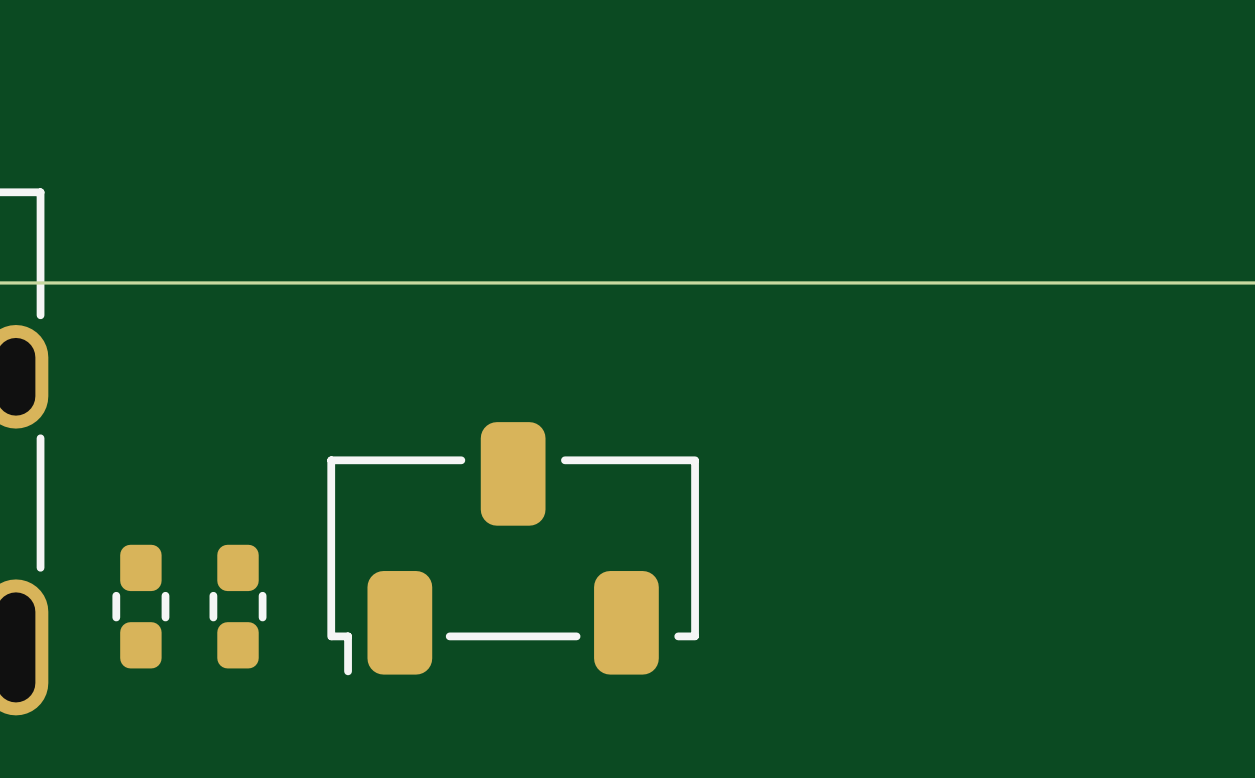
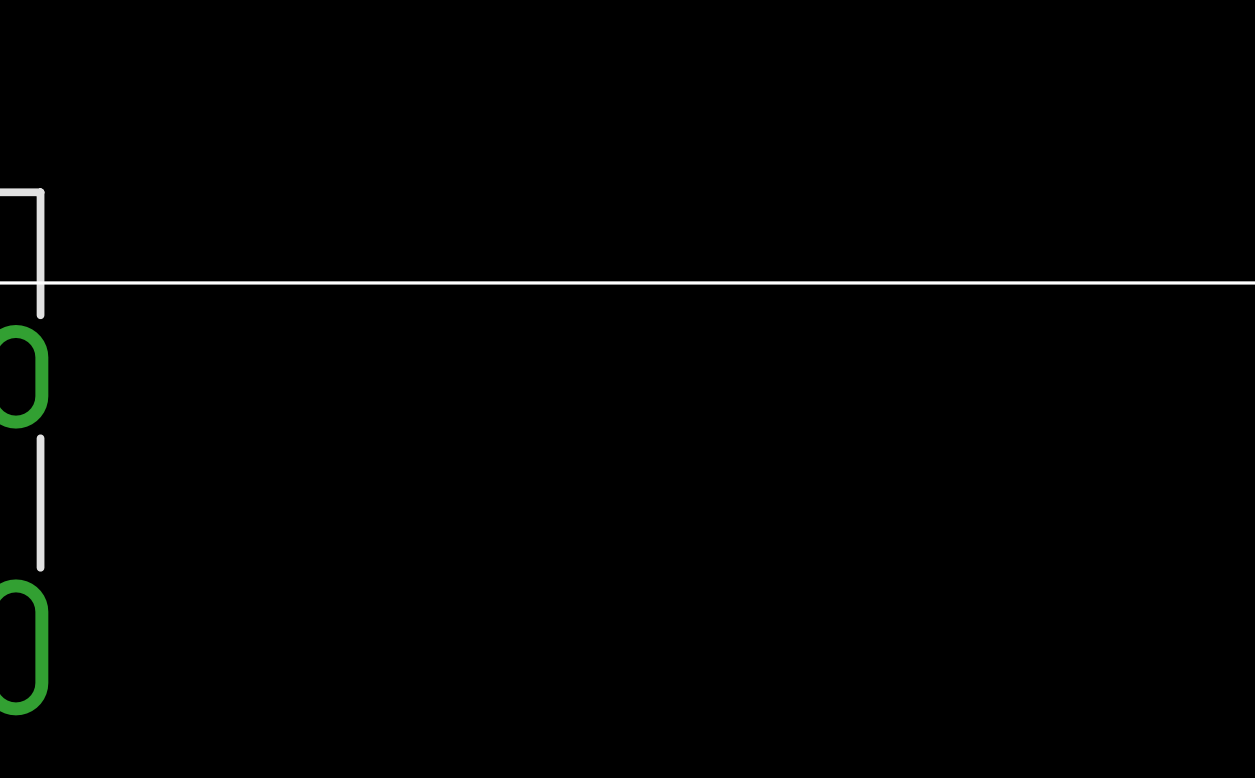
part: (513, 548) -> none
part: (140, 606) -> none
part: (238, 606) -> none

